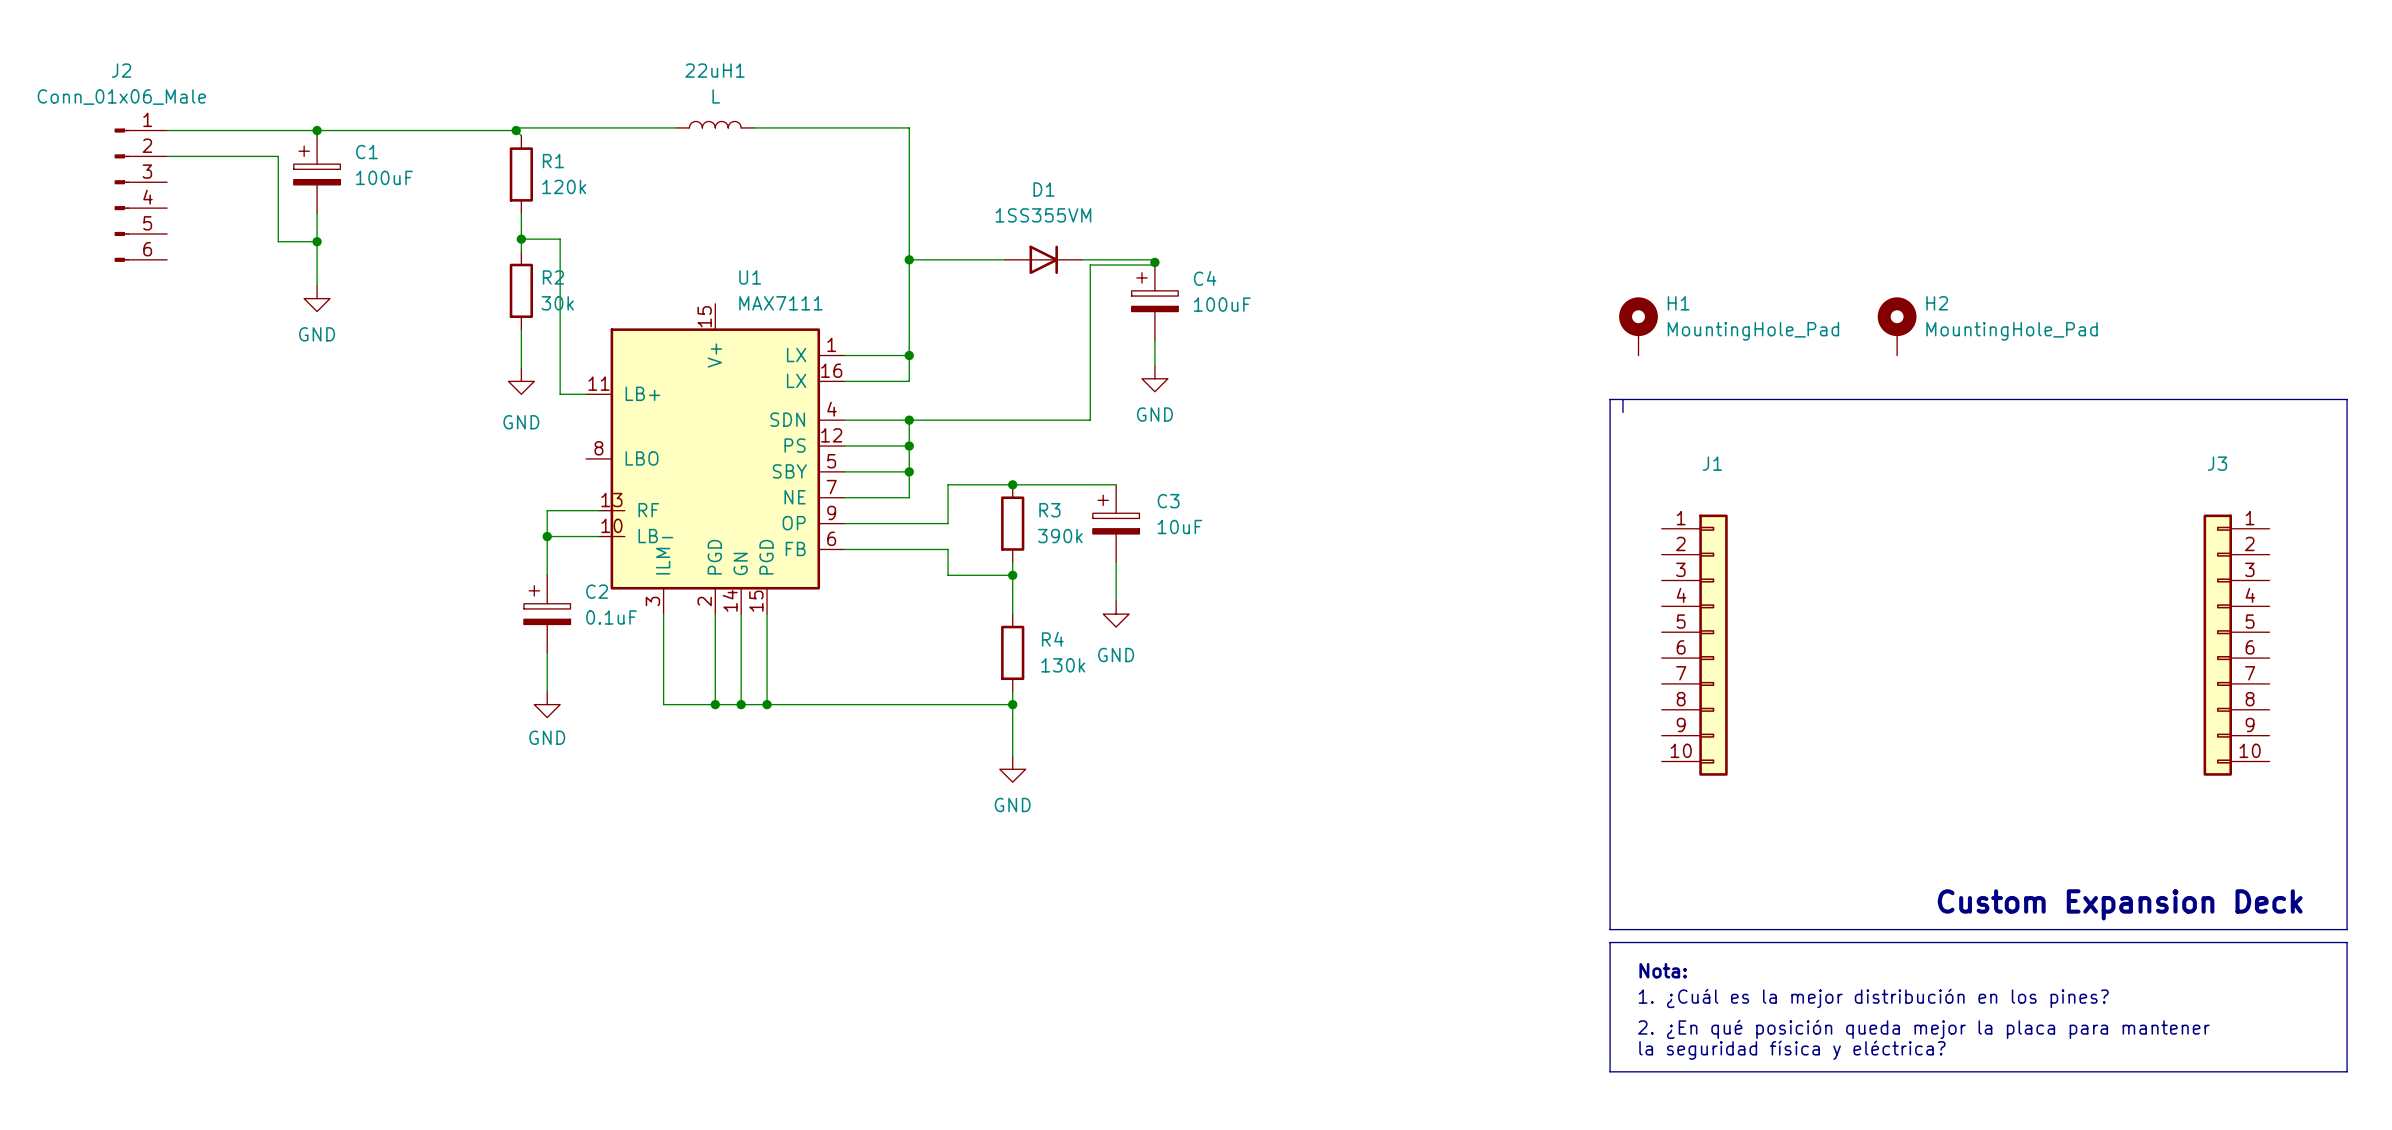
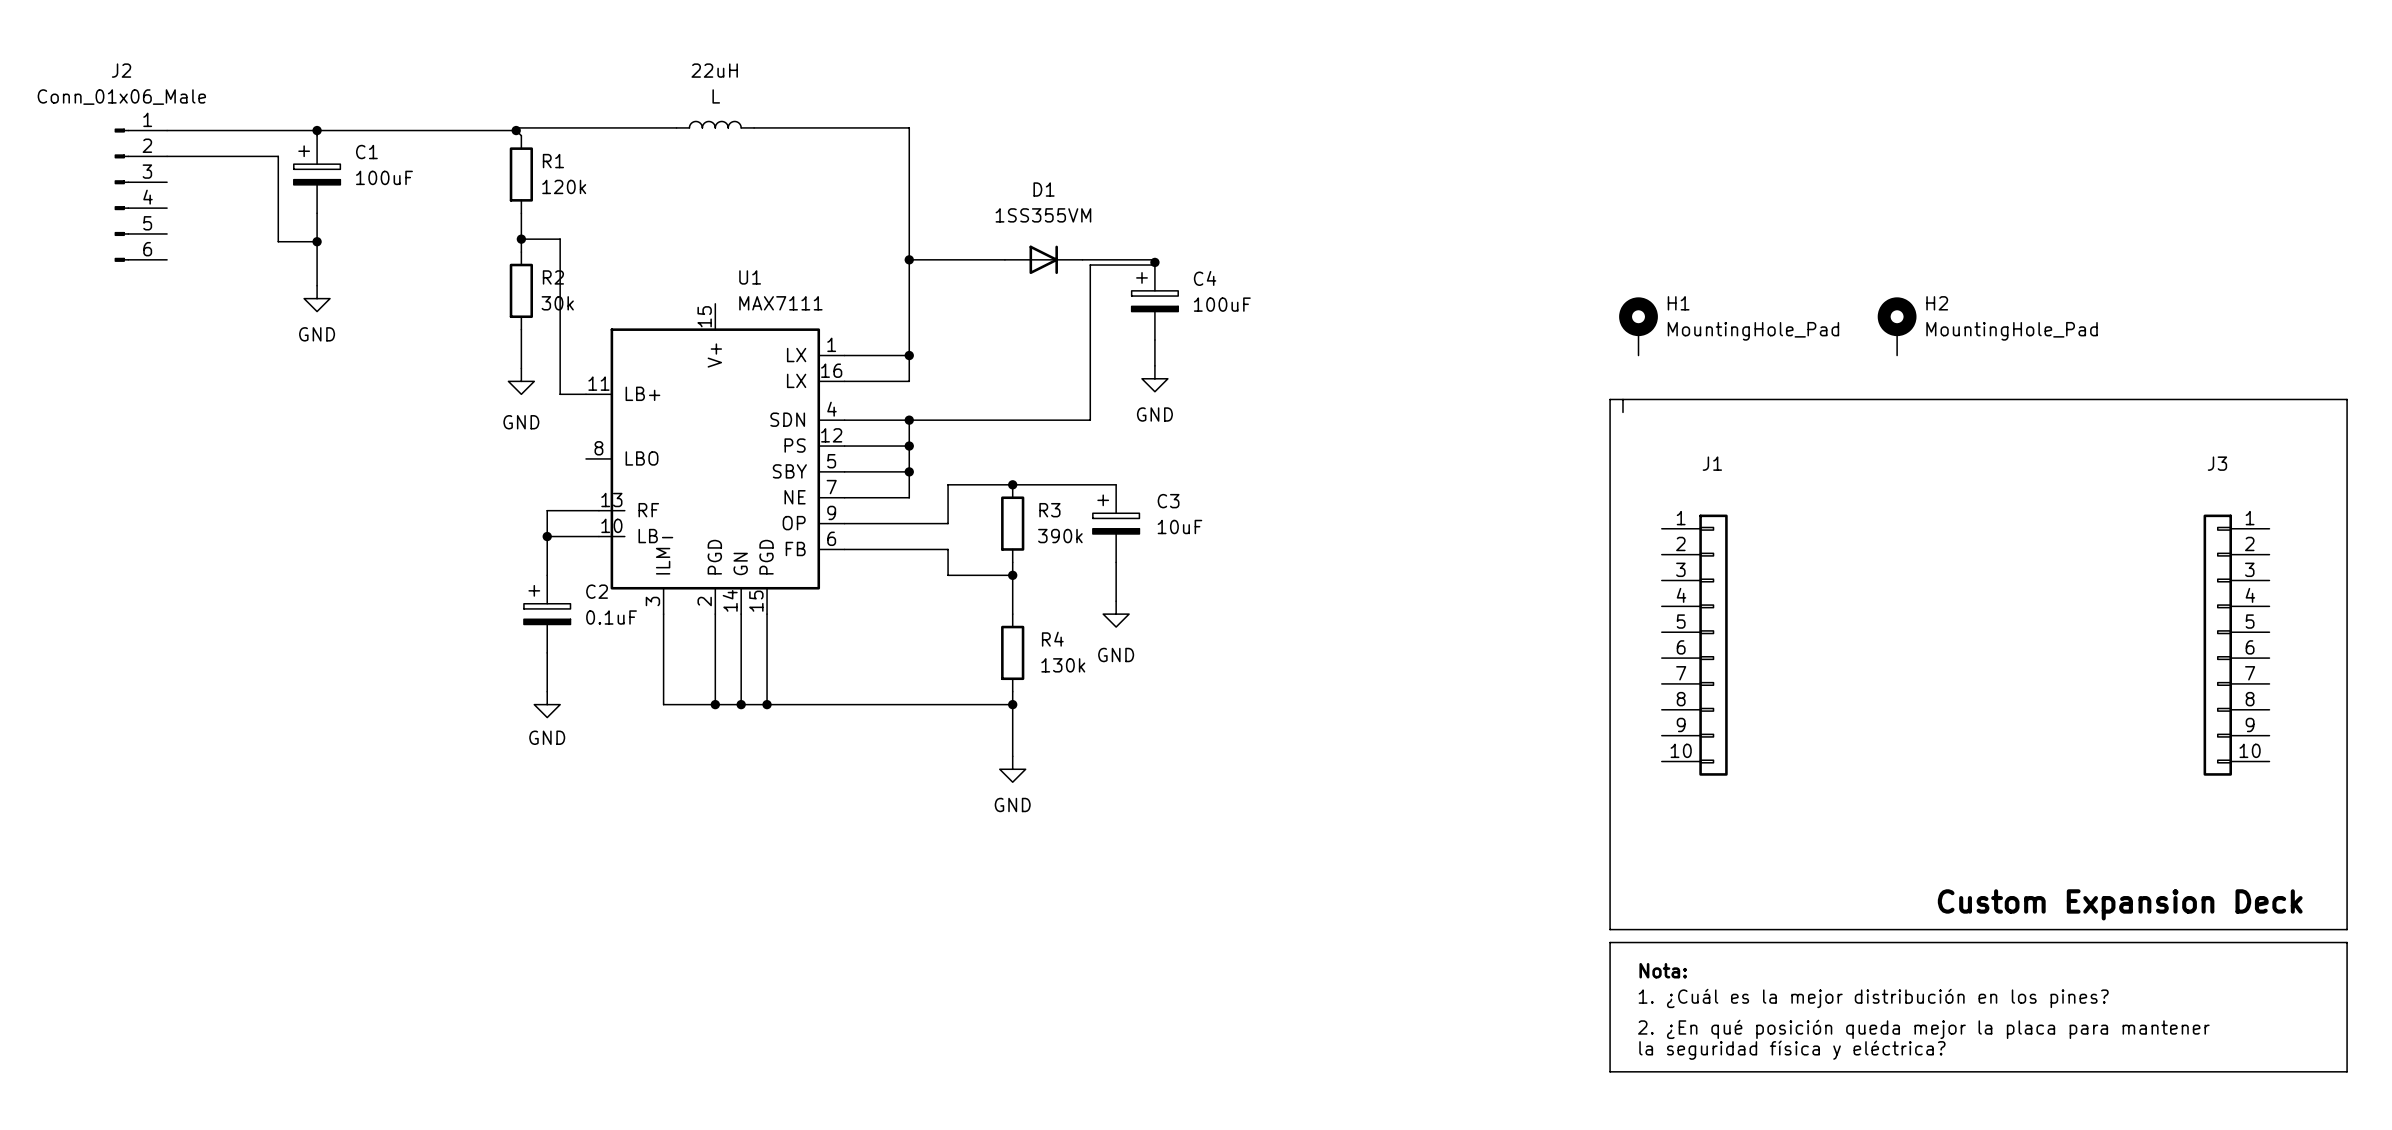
22uH1 name: 22uH1 (715, 70) -> 22uH (714, 70)

